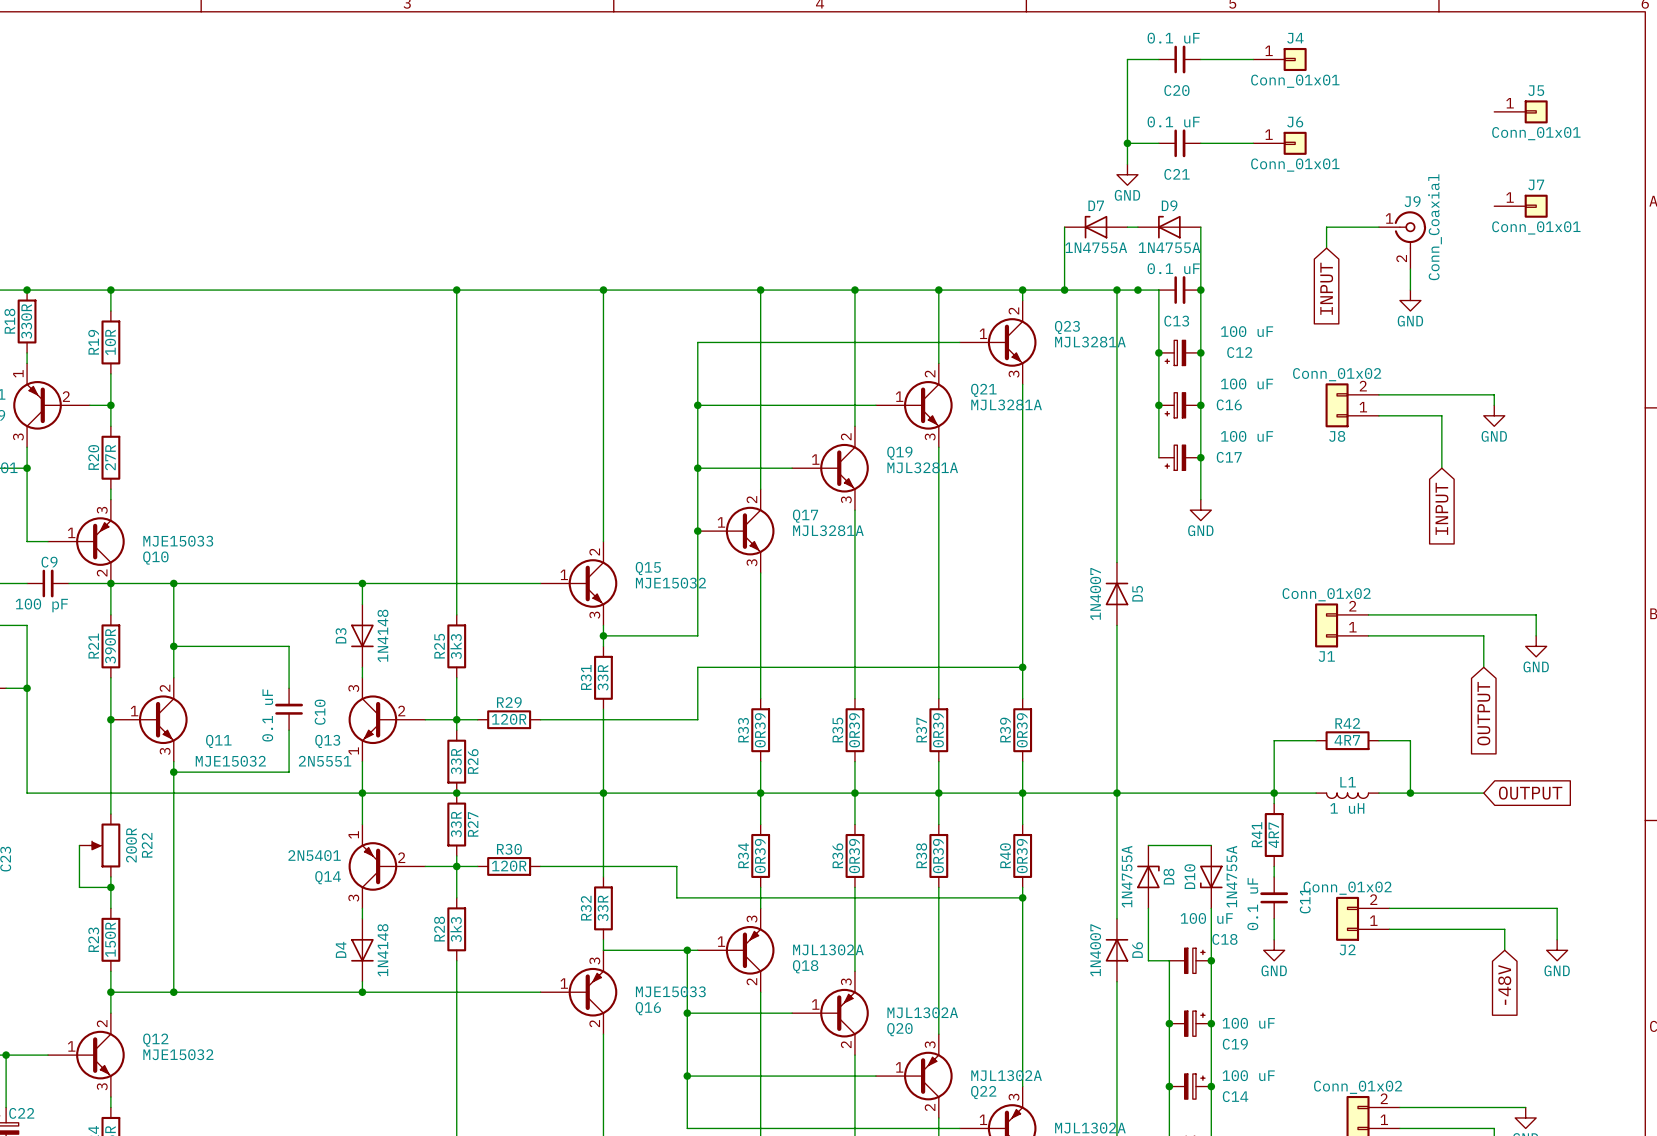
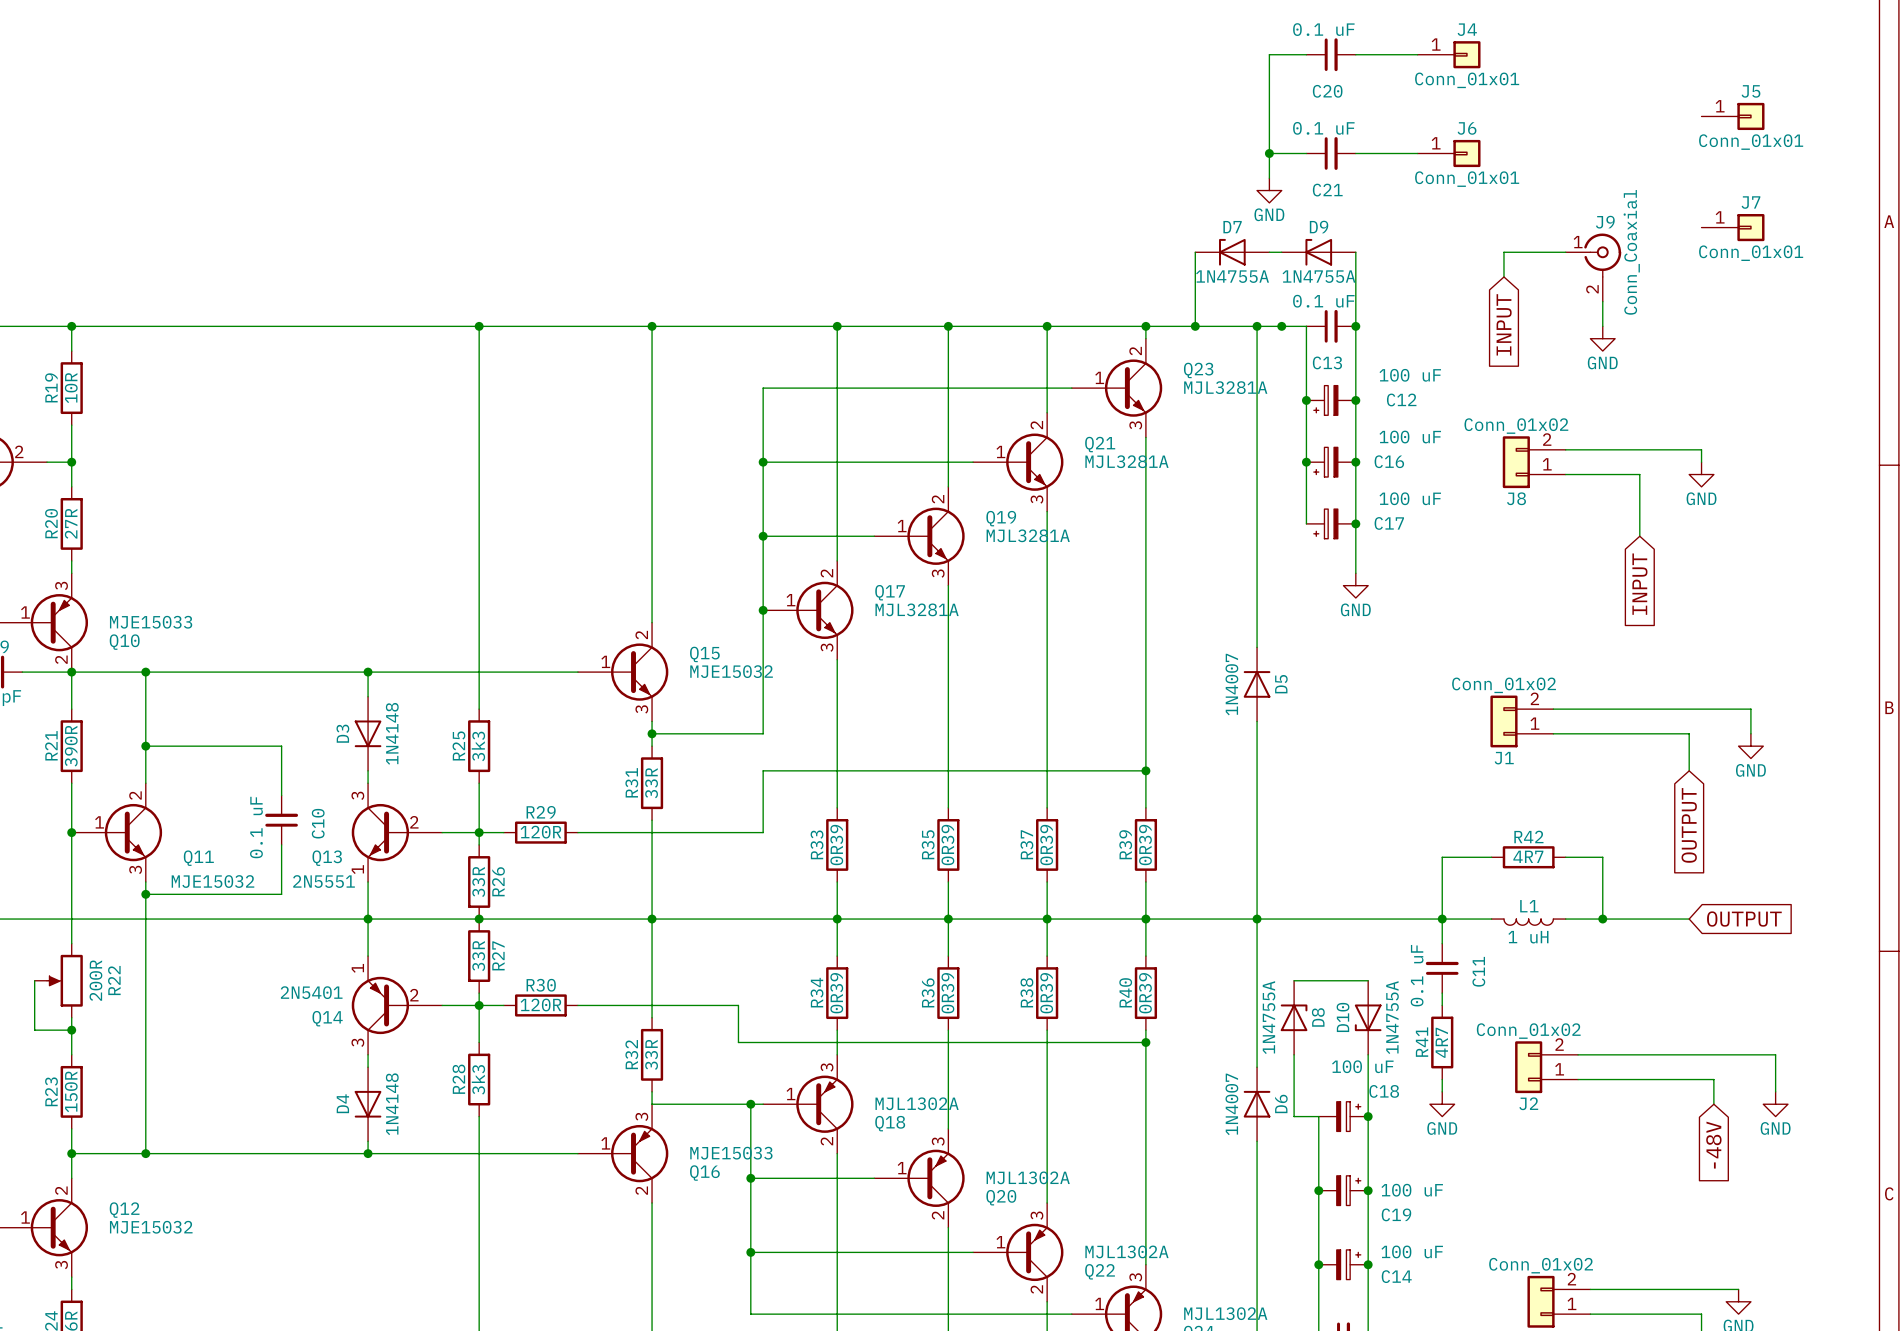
R41 position: (1274, 835) -> (1442, 1042)
C11 position: (1274, 897) -> (1442, 968)

